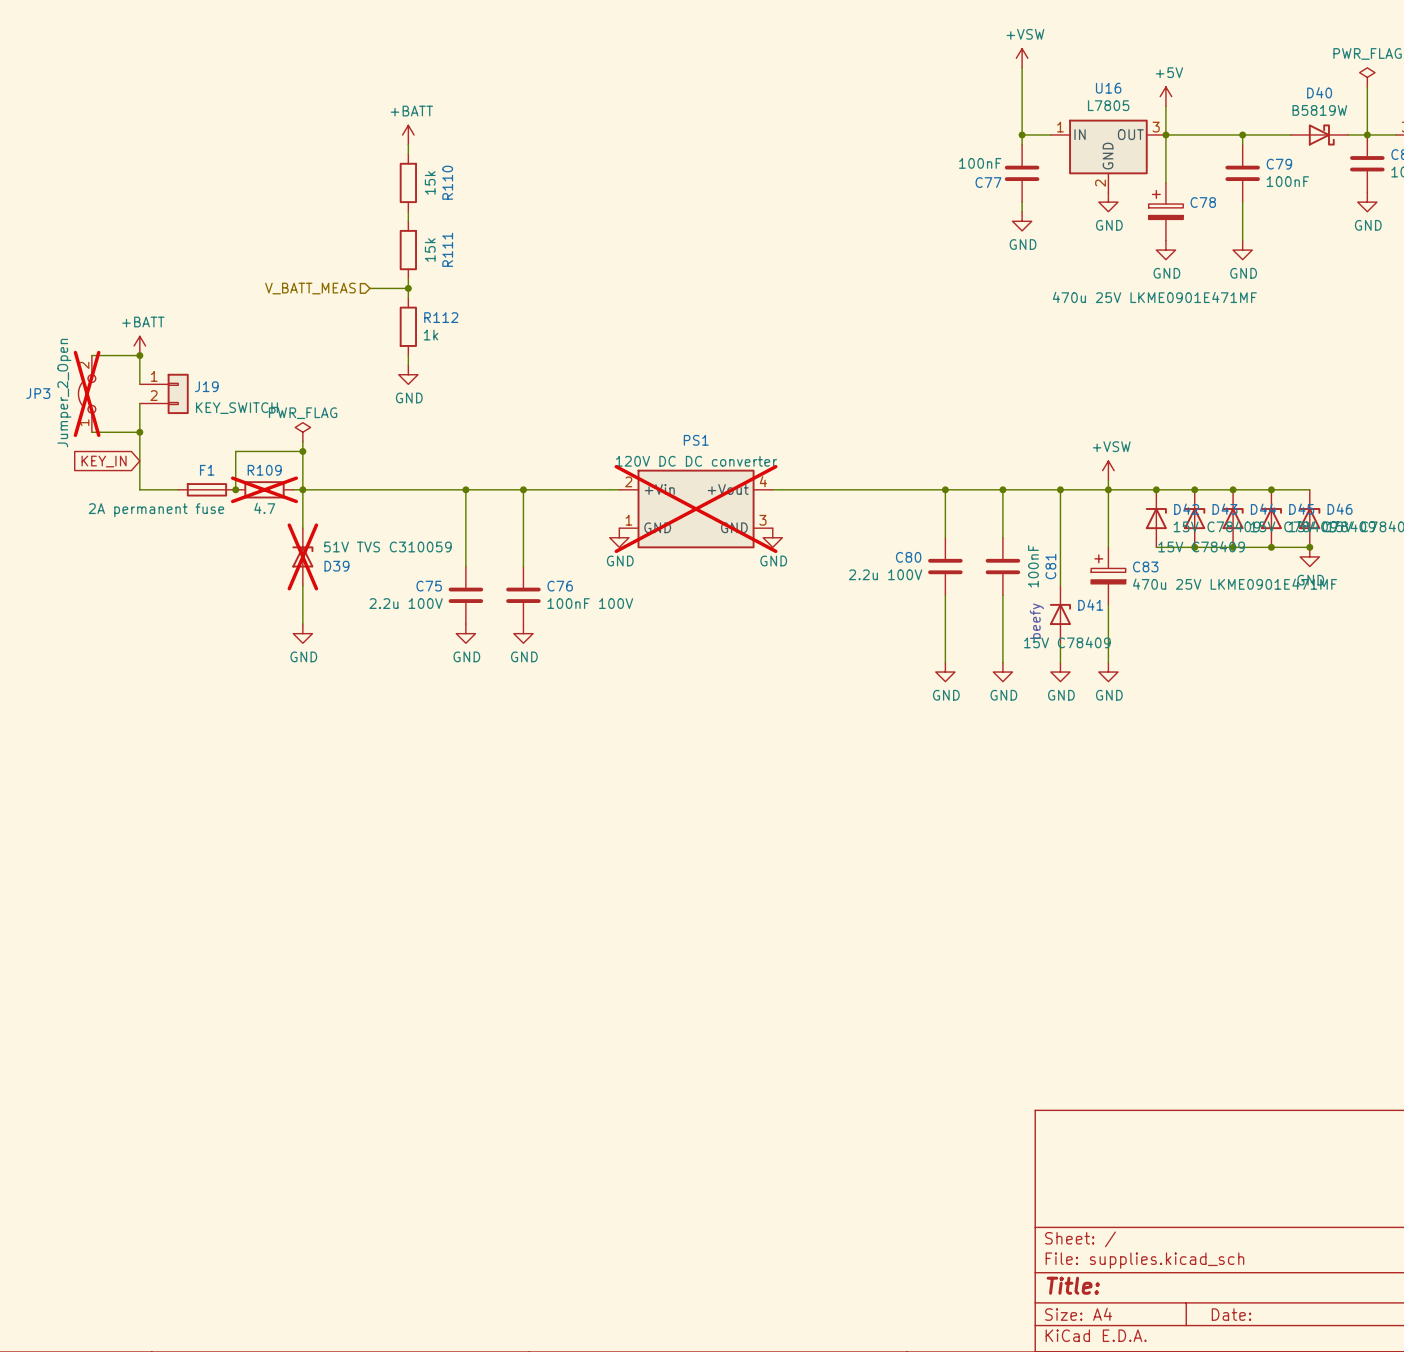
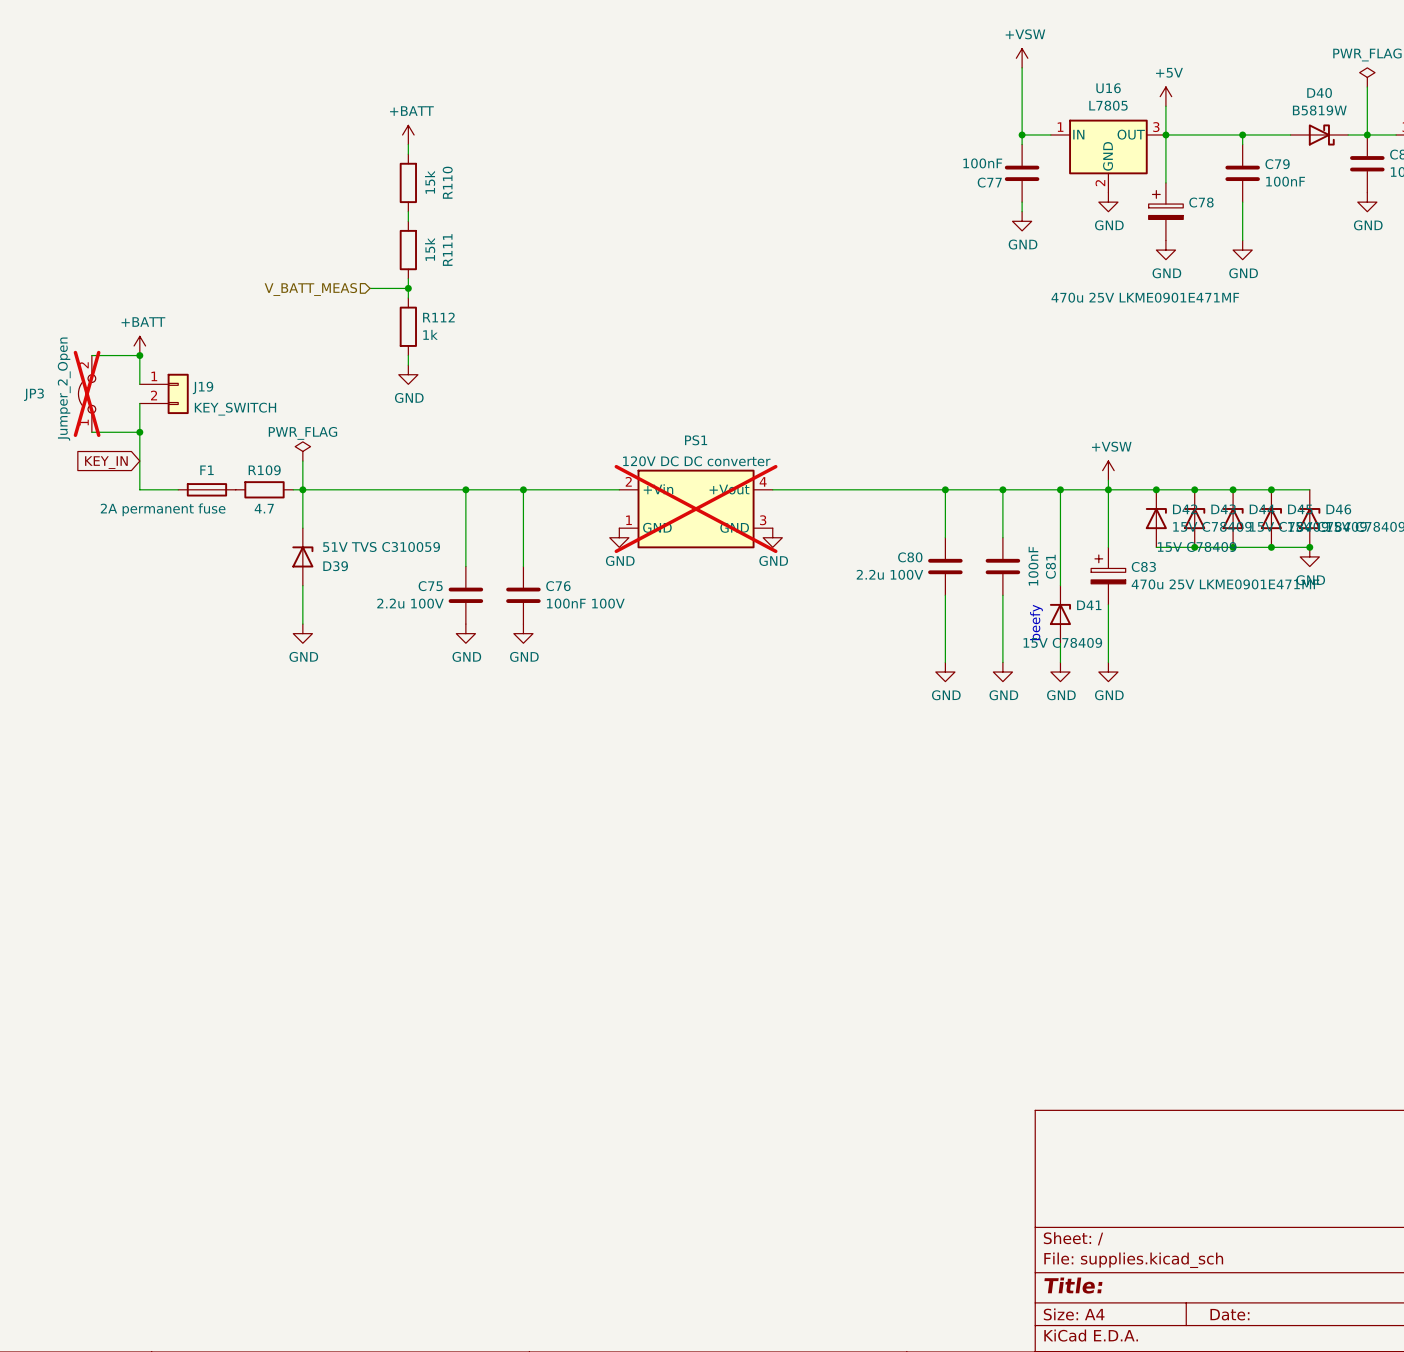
power symbol position: PWR_FLAG (302, 432) -> PWR_FLAG (302, 451)
wire: (302, 451) (235, 451) (235, 489) -> none
junction: (302, 451) -> none
junction: (235, 489) -> none
R109 do-not-place cross: (264, 489) -> none
D39 do-not-place cross: (302, 556) -> none

